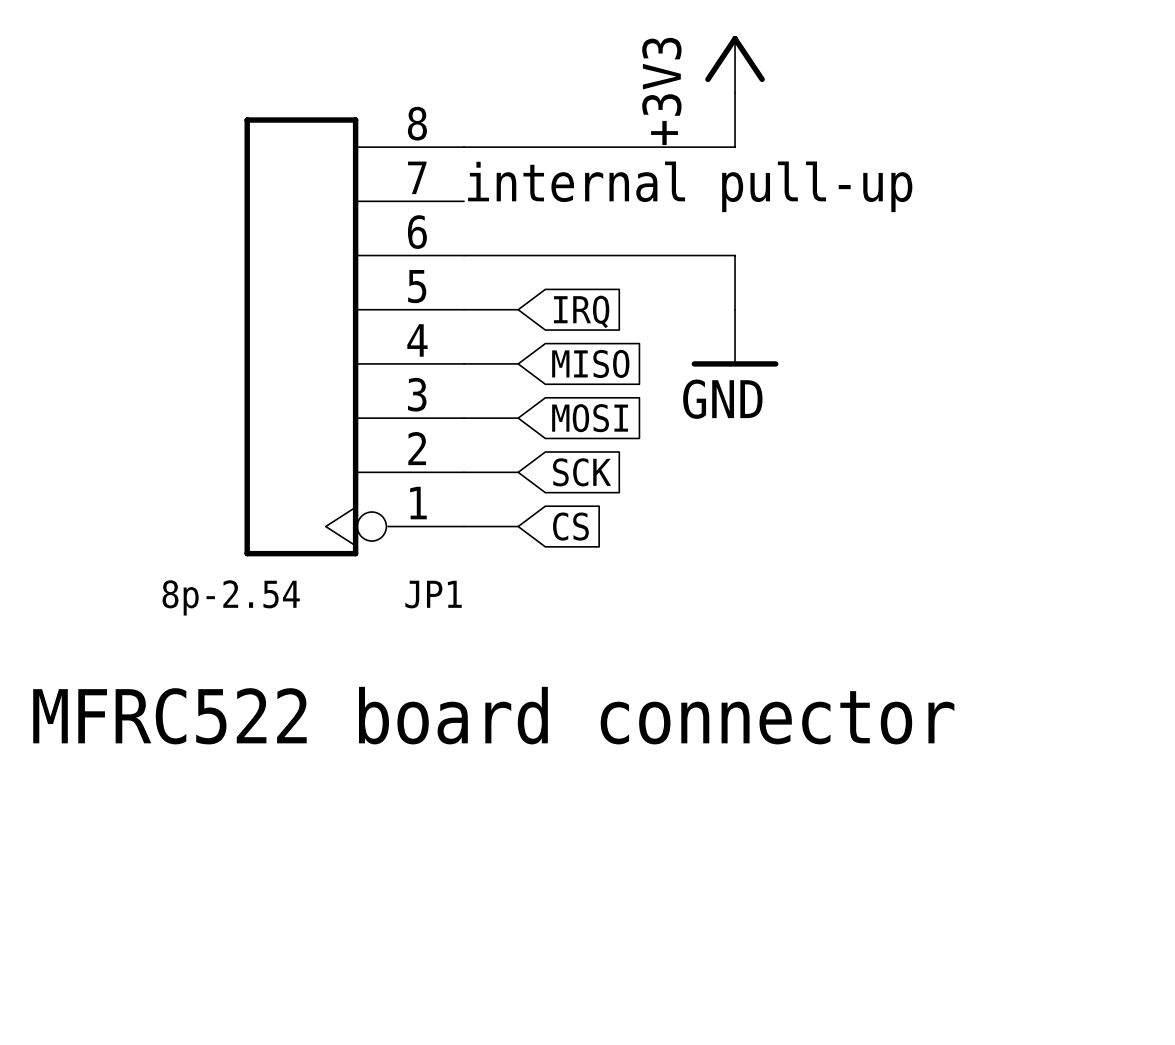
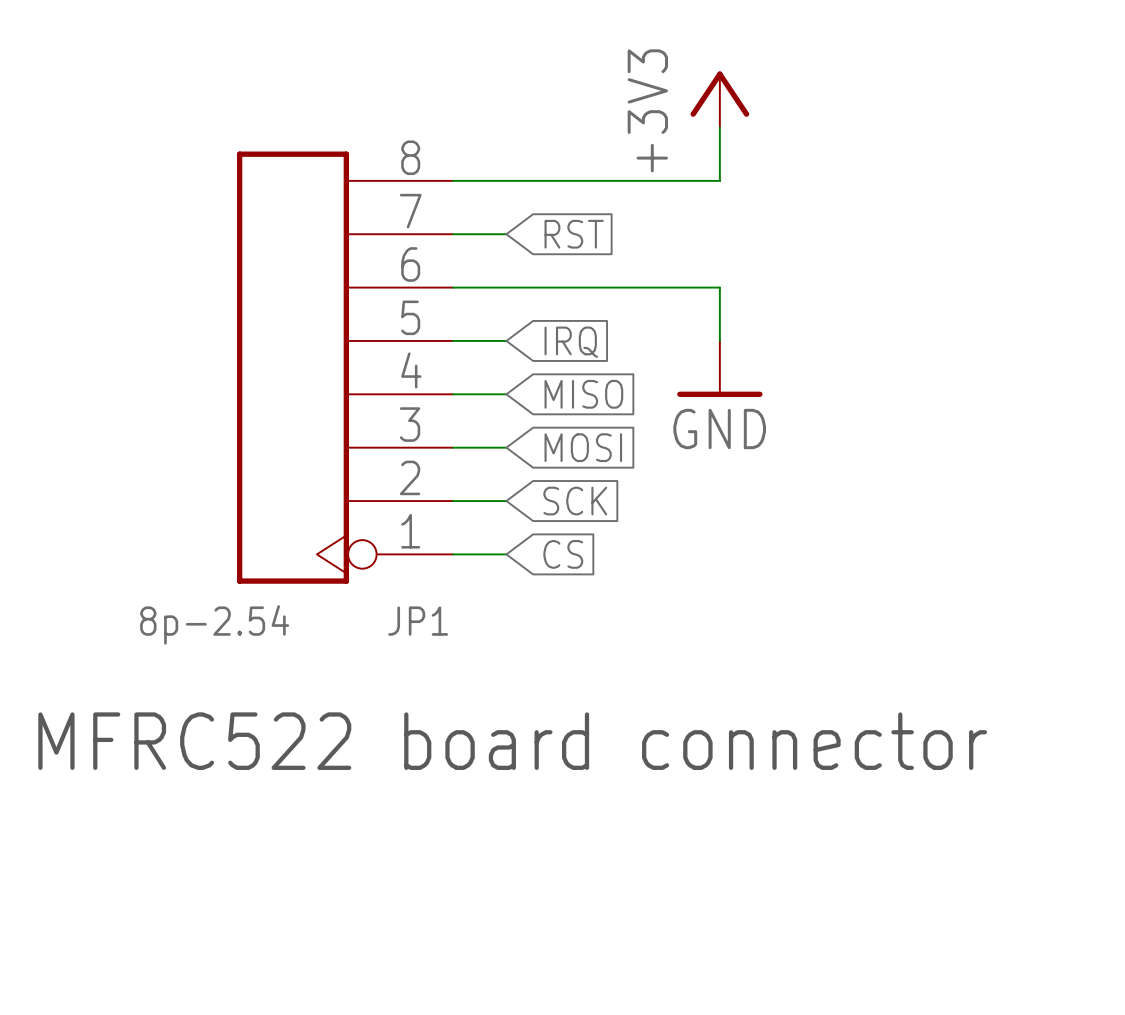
text: internal pull-up (690, 186) -> none
wire: none -> (453, 234) (506, 234)
global label: none -> RST (574, 234)

